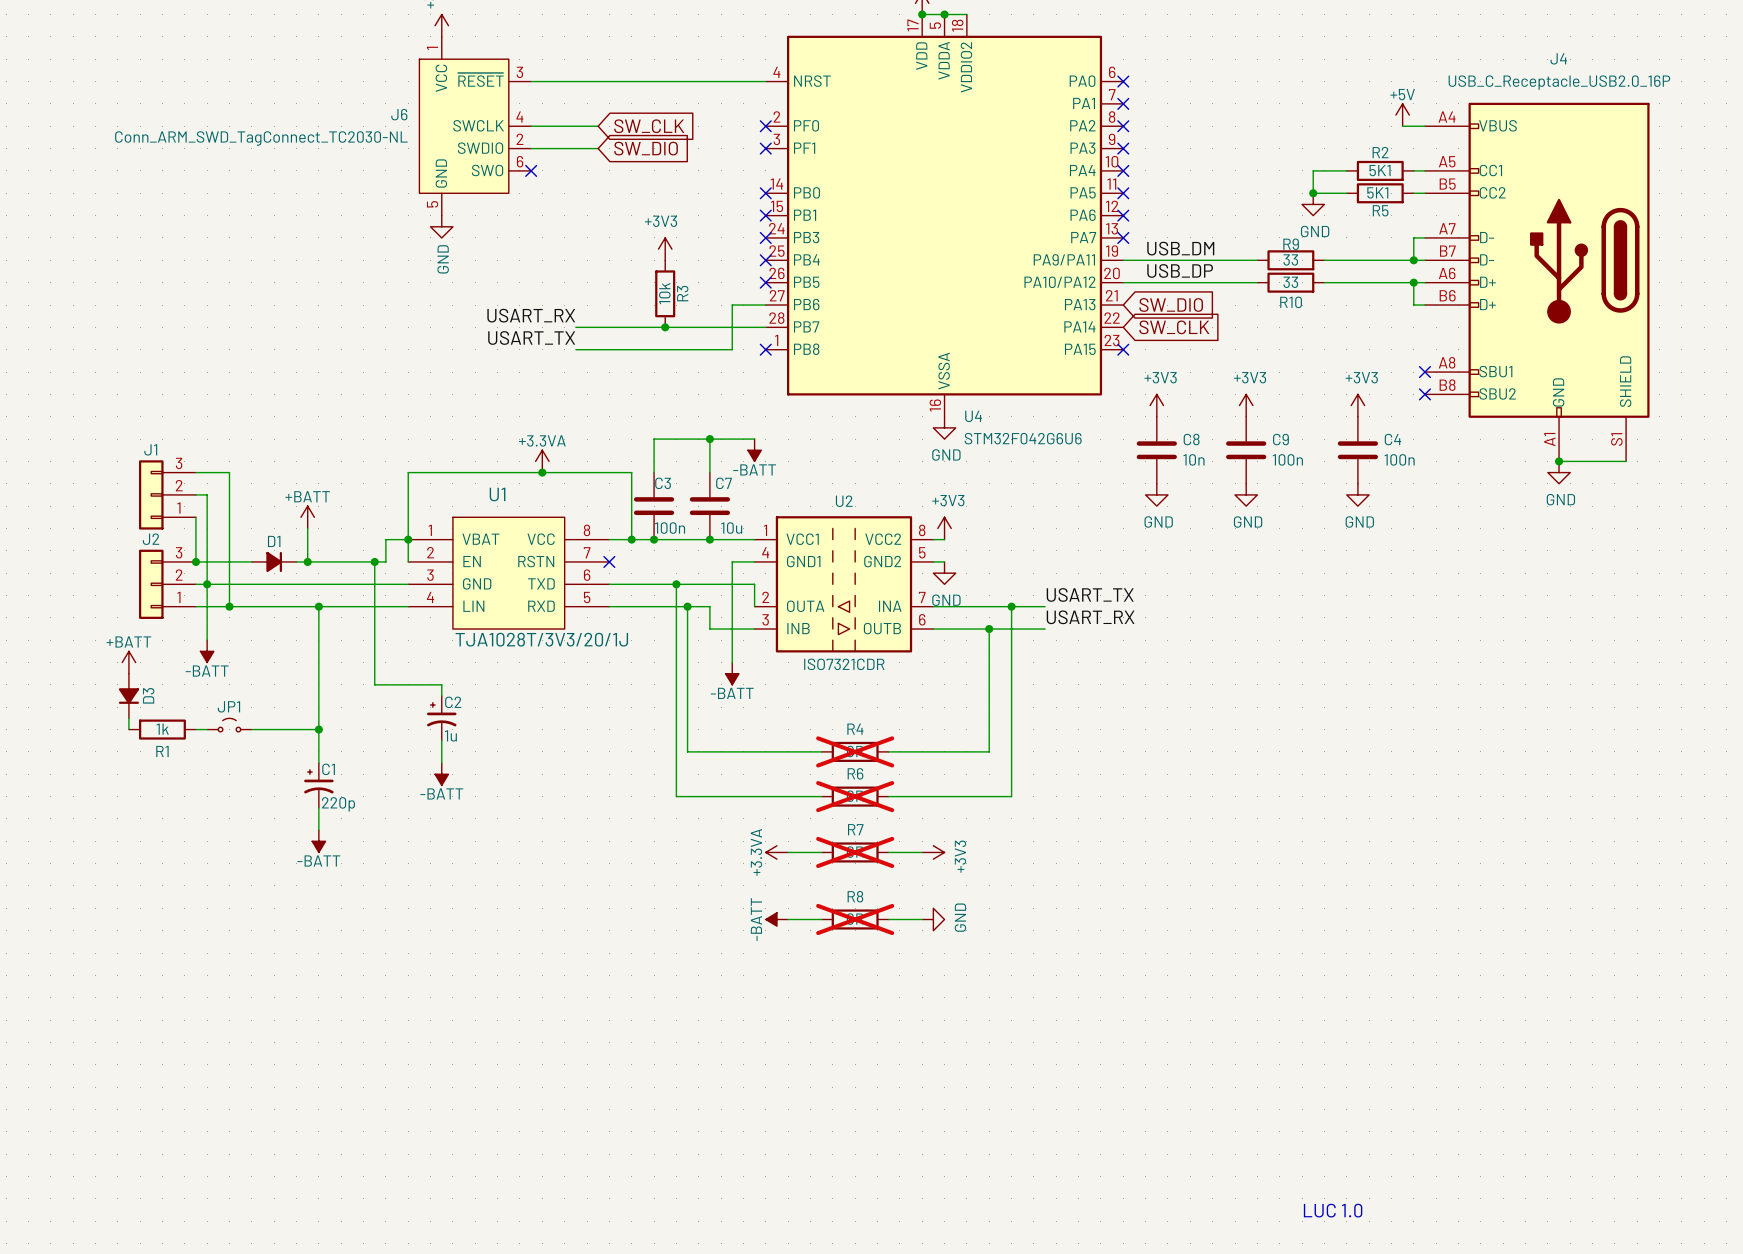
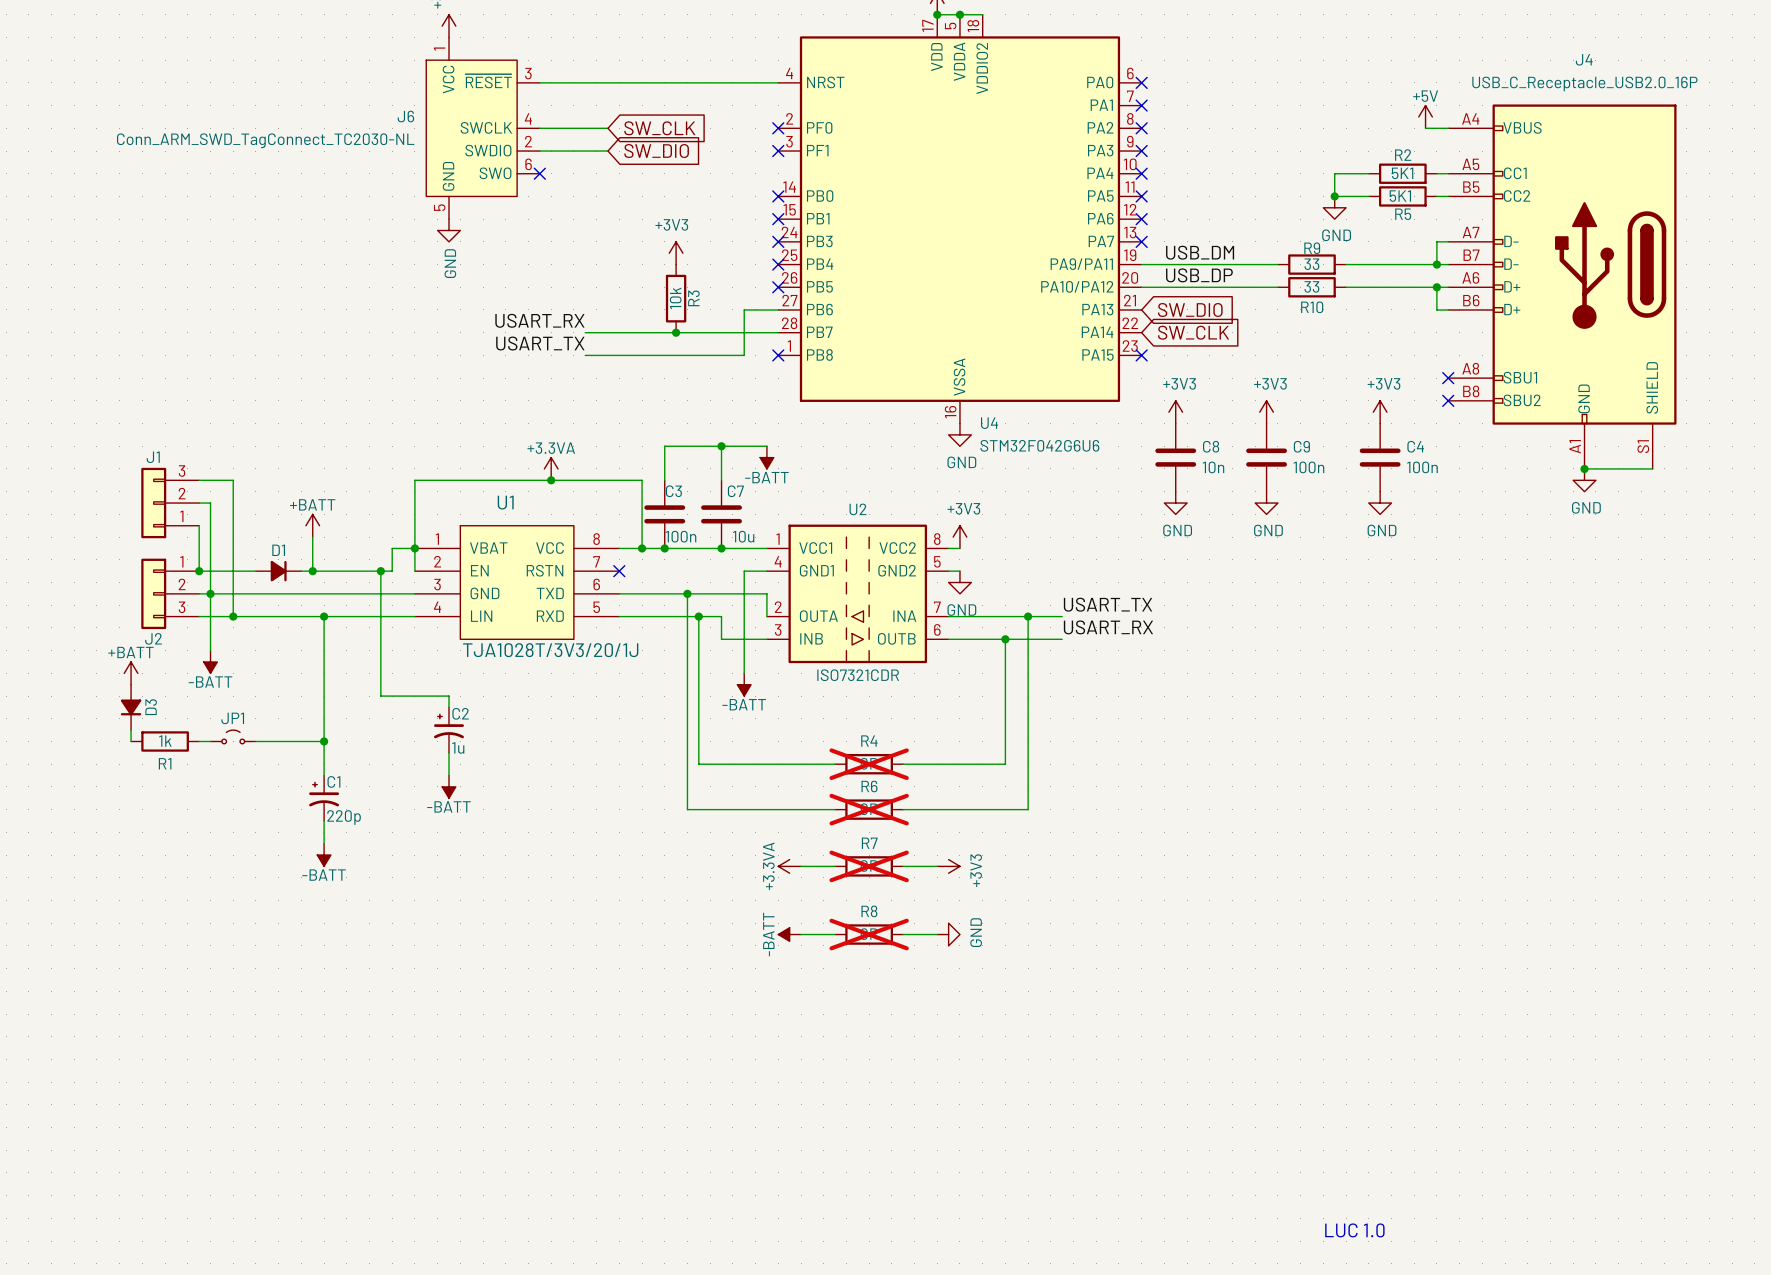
J2 flip: as is (151, 584) -> up-down (153, 593)

